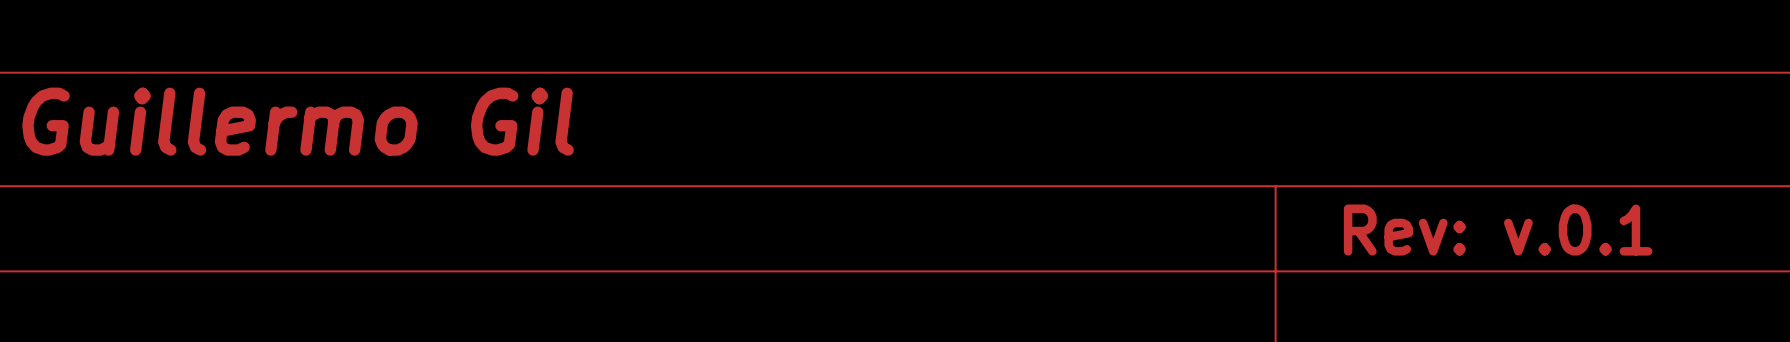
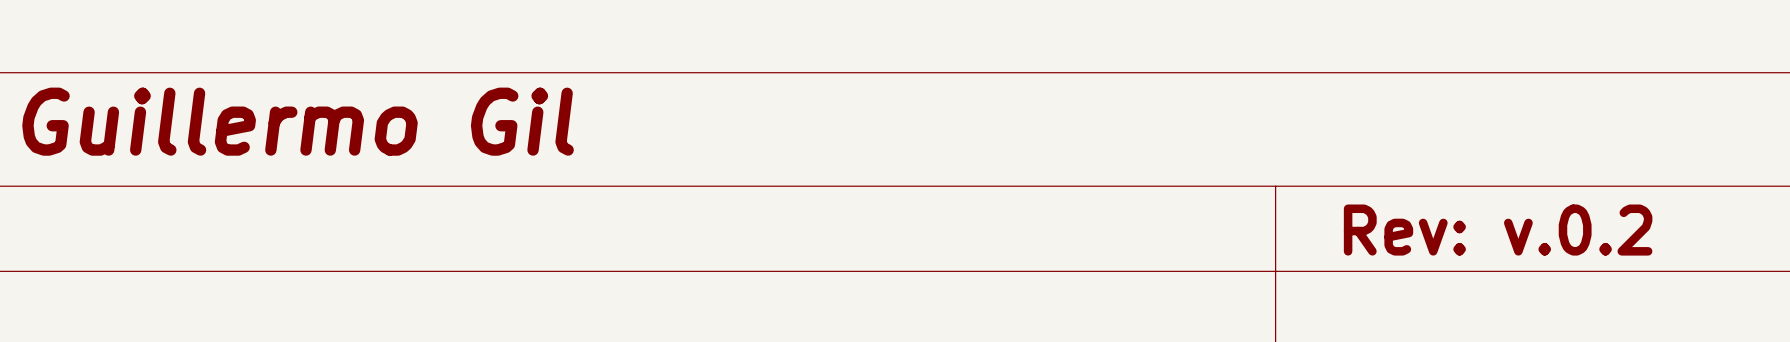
title block: Rev: v.0.1 (1498, 230) -> Rev: v.0.2 (1498, 230)

